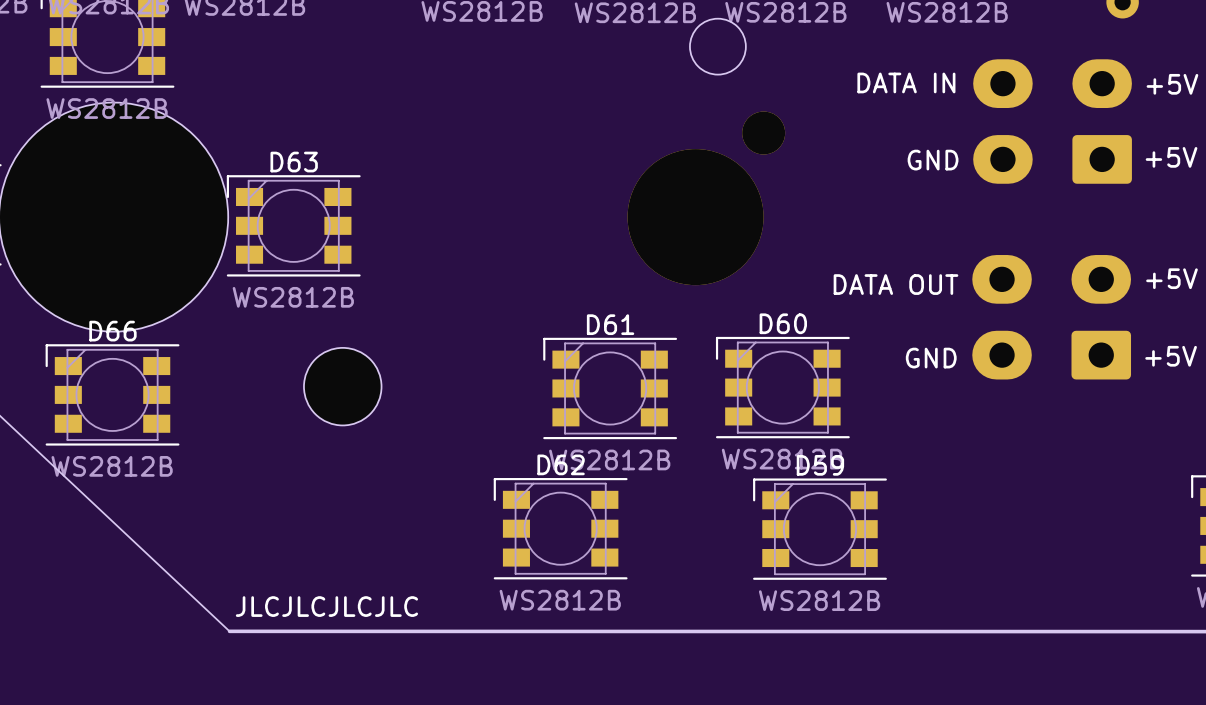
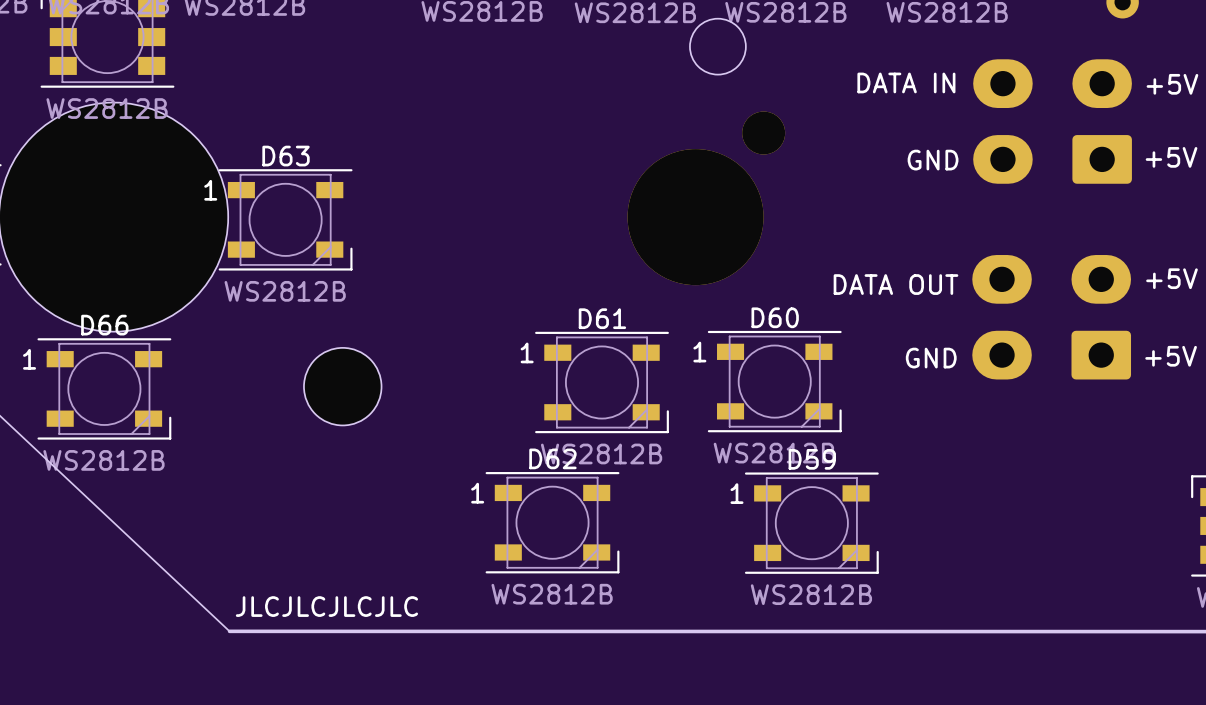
D63 footprint: [226, 175, 361, 277] -> [218, 169, 353, 271]
D60 footprint: [715, 336, 850, 439] -> [707, 330, 842, 433]
D61 footprint: [543, 337, 678, 440] -> [535, 331, 669, 434]
D66 footprint: [45, 344, 180, 446] -> [37, 338, 172, 440]
D62 footprint: [493, 478, 628, 580] -> [485, 472, 620, 574]
D59 footprint: [753, 478, 887, 580] -> [744, 472, 879, 574]

